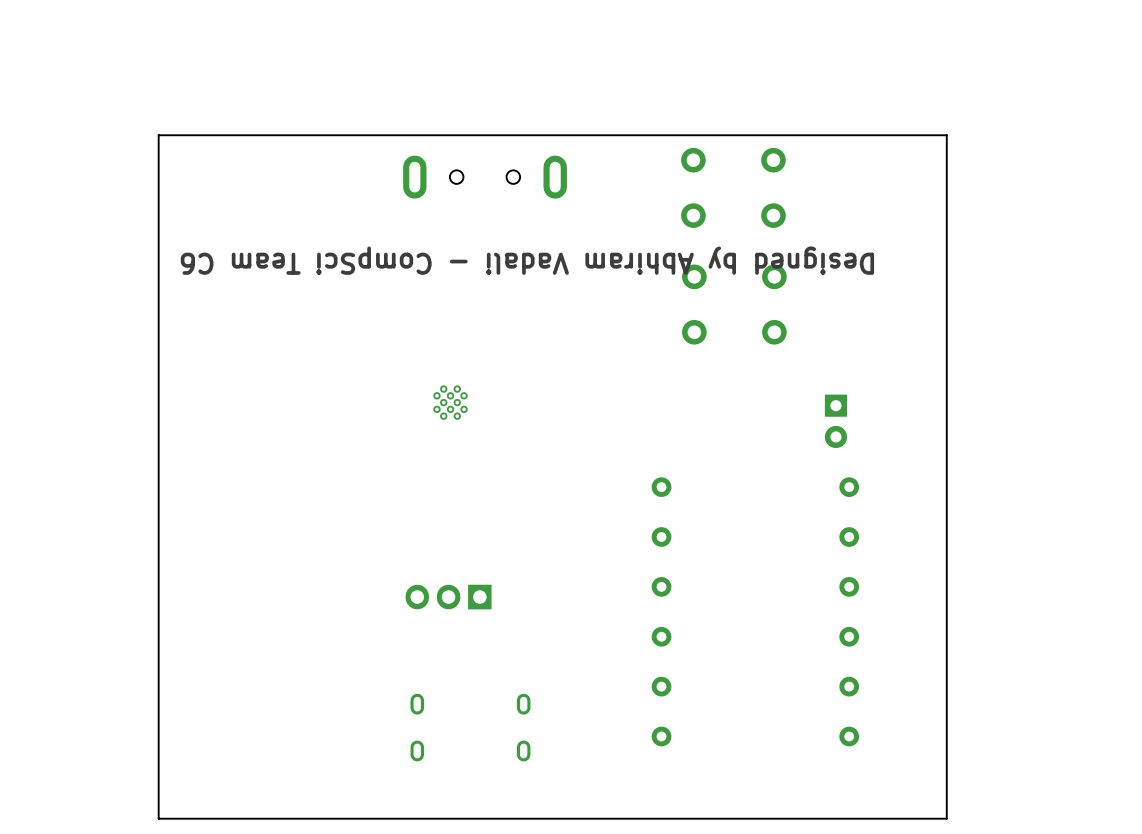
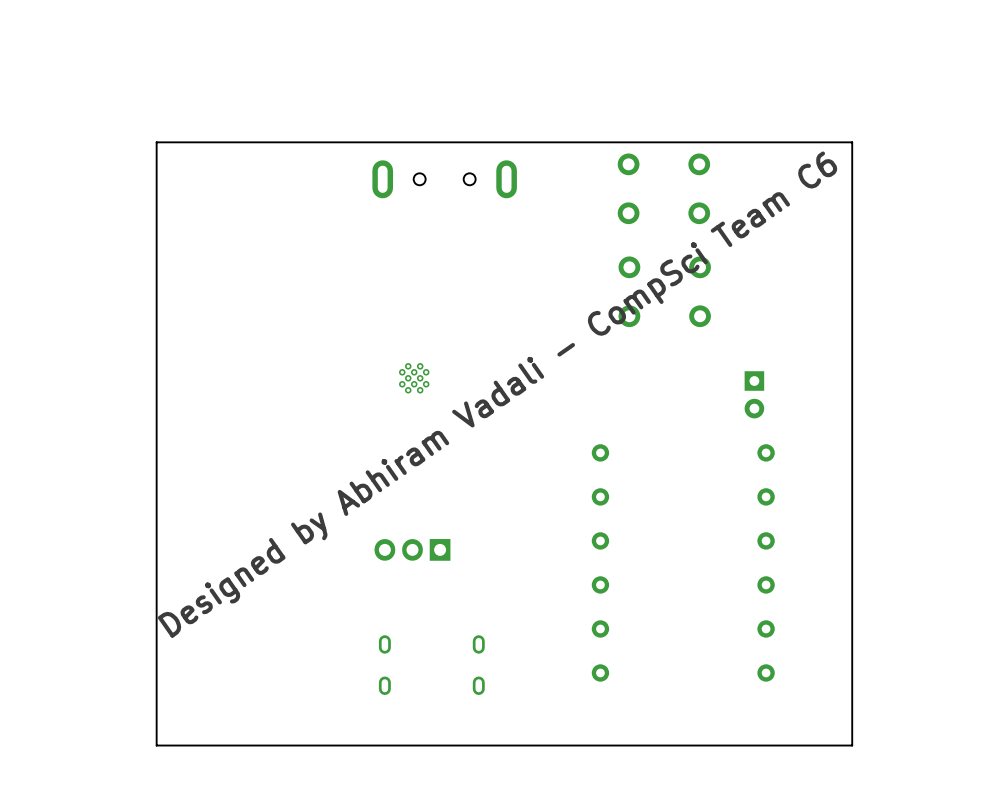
text: Designed by Abhiram Vadali - CompSci Team C6 (527, 260) -> none
text: none -> Designed by Abhiram Vadali - CompSci Team C6 (497, 394)

